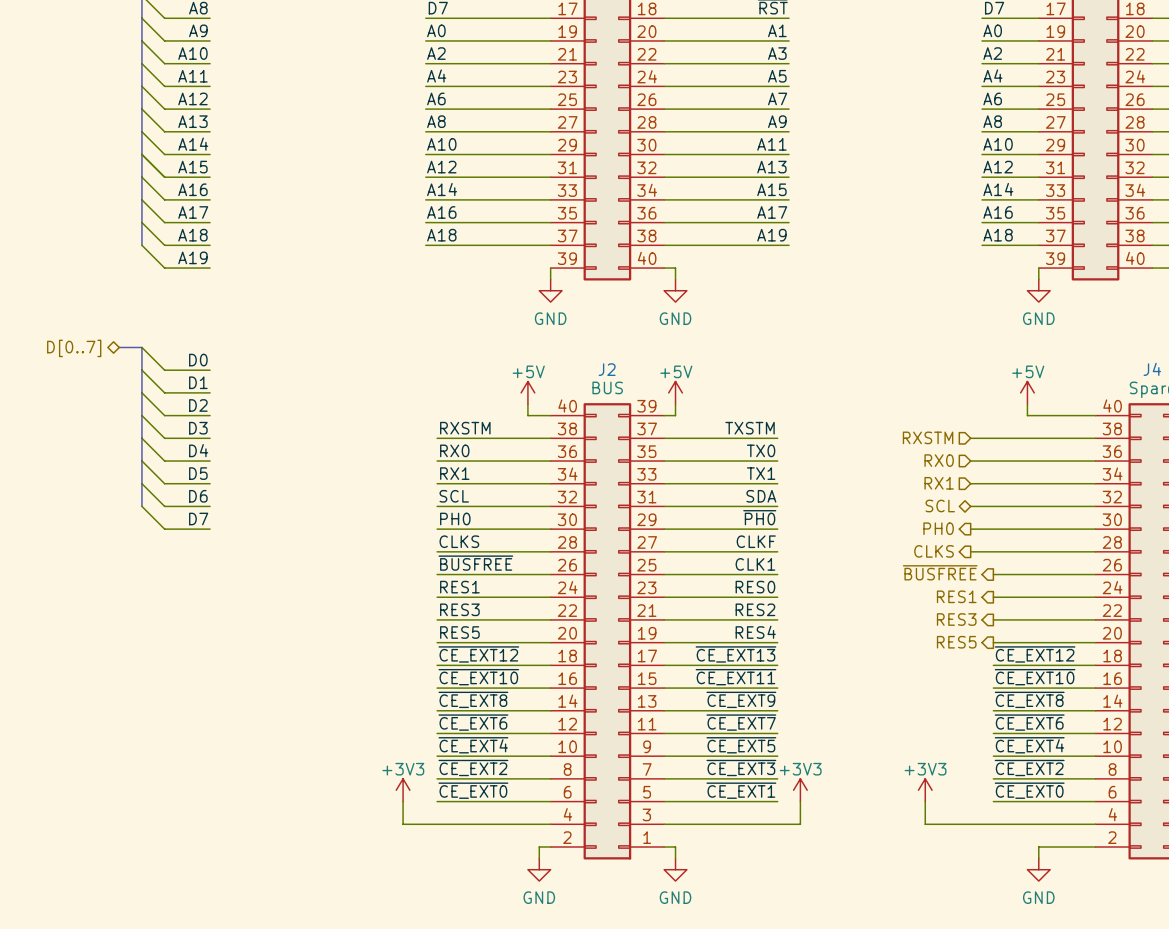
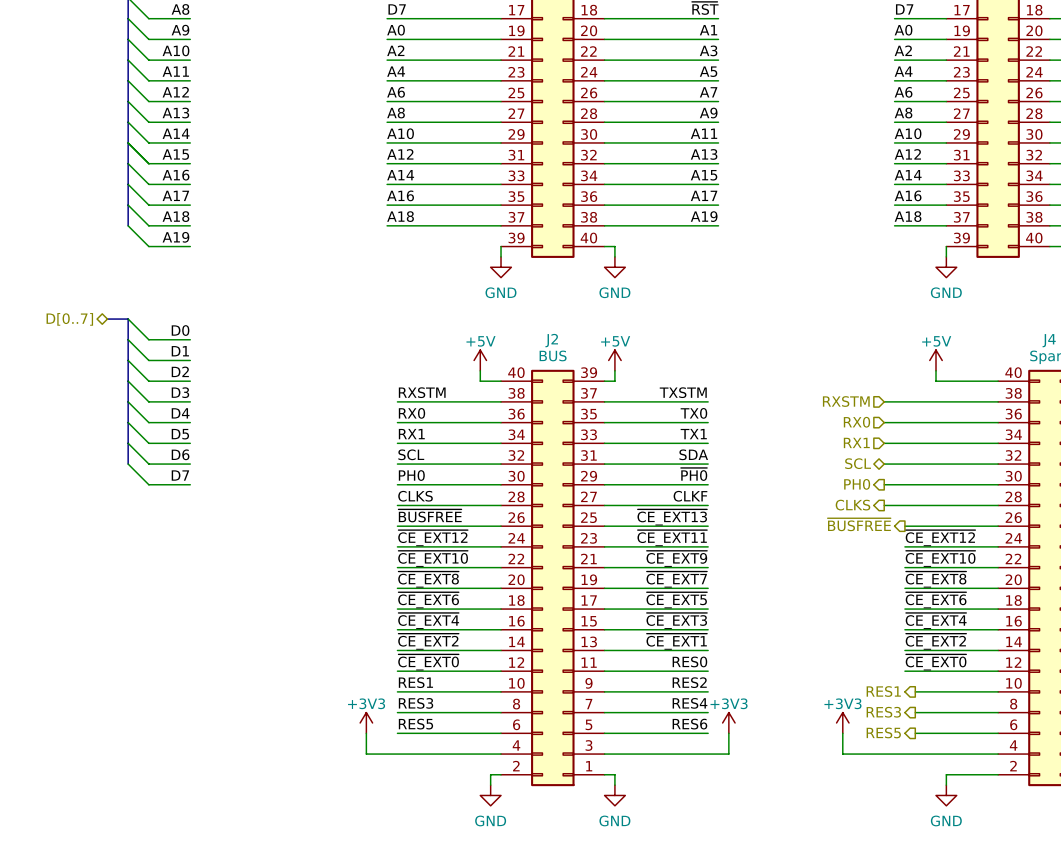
label: CLK1 (755, 564) -> ~{CE_EXT13} (672, 517)
label: none -> ~{CE_EXT12} (940, 538)
label: RES1 (459, 587) -> ~{CE_EXT12} (433, 538)
label: RES0 (755, 587) -> ~{CE_EXT11} (672, 538)
hierarchical label position: RES1 (956, 596) -> RES1 (883, 691)
label: RES3 (459, 609) -> ~{CE_EXT10} (433, 558)
label: RES2 (755, 609) -> ~{CE_EXT9} (676, 558)
label: none -> ~{CE_EXT10} (940, 558)
hierarchical label position: RES3 (956, 619) -> RES3 (883, 712)
label: none -> ~{CE_EXT8} (936, 579)
label: RES5 (459, 632) -> ~{CE_EXT8} (428, 579)
label: RES4 (755, 632) -> ~{CE_EXT7} (676, 579)
hierarchical label position: RES5 (956, 642) -> RES5 (883, 732)
label: ~{CE_EXT12} (478, 654) -> ~{CE_EXT6} (428, 600)
label: ~{CE_EXT13} (735, 654) -> ~{CE_EXT5} (676, 600)
label: ~{CE_EXT12} (1035, 654) -> ~{CE_EXT6} (936, 600)
label: ~{CE_EXT10} (478, 677) -> ~{CE_EXT4} (428, 621)
label: ~{CE_EXT11} (735, 677) -> ~{CE_EXT3} (676, 621)
label: ~{CE_EXT10} (1035, 677) -> ~{CE_EXT4} (936, 621)
label: ~{CE_EXT8} (473, 699) -> ~{CE_EXT2} (428, 641)
label: ~{CE_EXT9} (741, 699) -> ~{CE_EXT1} (676, 641)
label: ~{CE_EXT8} (1029, 699) -> ~{CE_EXT2} (936, 641)
label: ~{CE_EXT6} (473, 722) -> ~{CE_EXT0} (428, 662)
label: ~{CE_EXT7} (741, 722) -> RES0 (689, 661)
label: ~{CE_EXT6} (1029, 722) -> ~{CE_EXT0} (936, 662)
label: ~{CE_EXT4} (473, 745) -> RES1 (415, 682)
label: ~{CE_EXT5} (741, 745) -> RES2 (689, 682)
label: ~{CE_EXT4} (1029, 745) -> none
wire: (993, 756) (1004, 756) -> none
label: ~{CE_EXT2} (473, 767) -> RES3 (416, 703)
label: ~{CE_EXT3} (741, 767) -> RES4 (690, 703)
label: ~{CE_EXT2} (1029, 767) -> none
wire: (993, 778) (1004, 778) -> none
label: ~{CE_EXT0} (473, 790) -> RES5 (415, 724)
label: ~{CE_EXT1} (741, 790) -> RES6 (689, 724)
label: ~{CE_EXT0} (1029, 790) -> none
wire: (993, 801) (1004, 801) -> none

